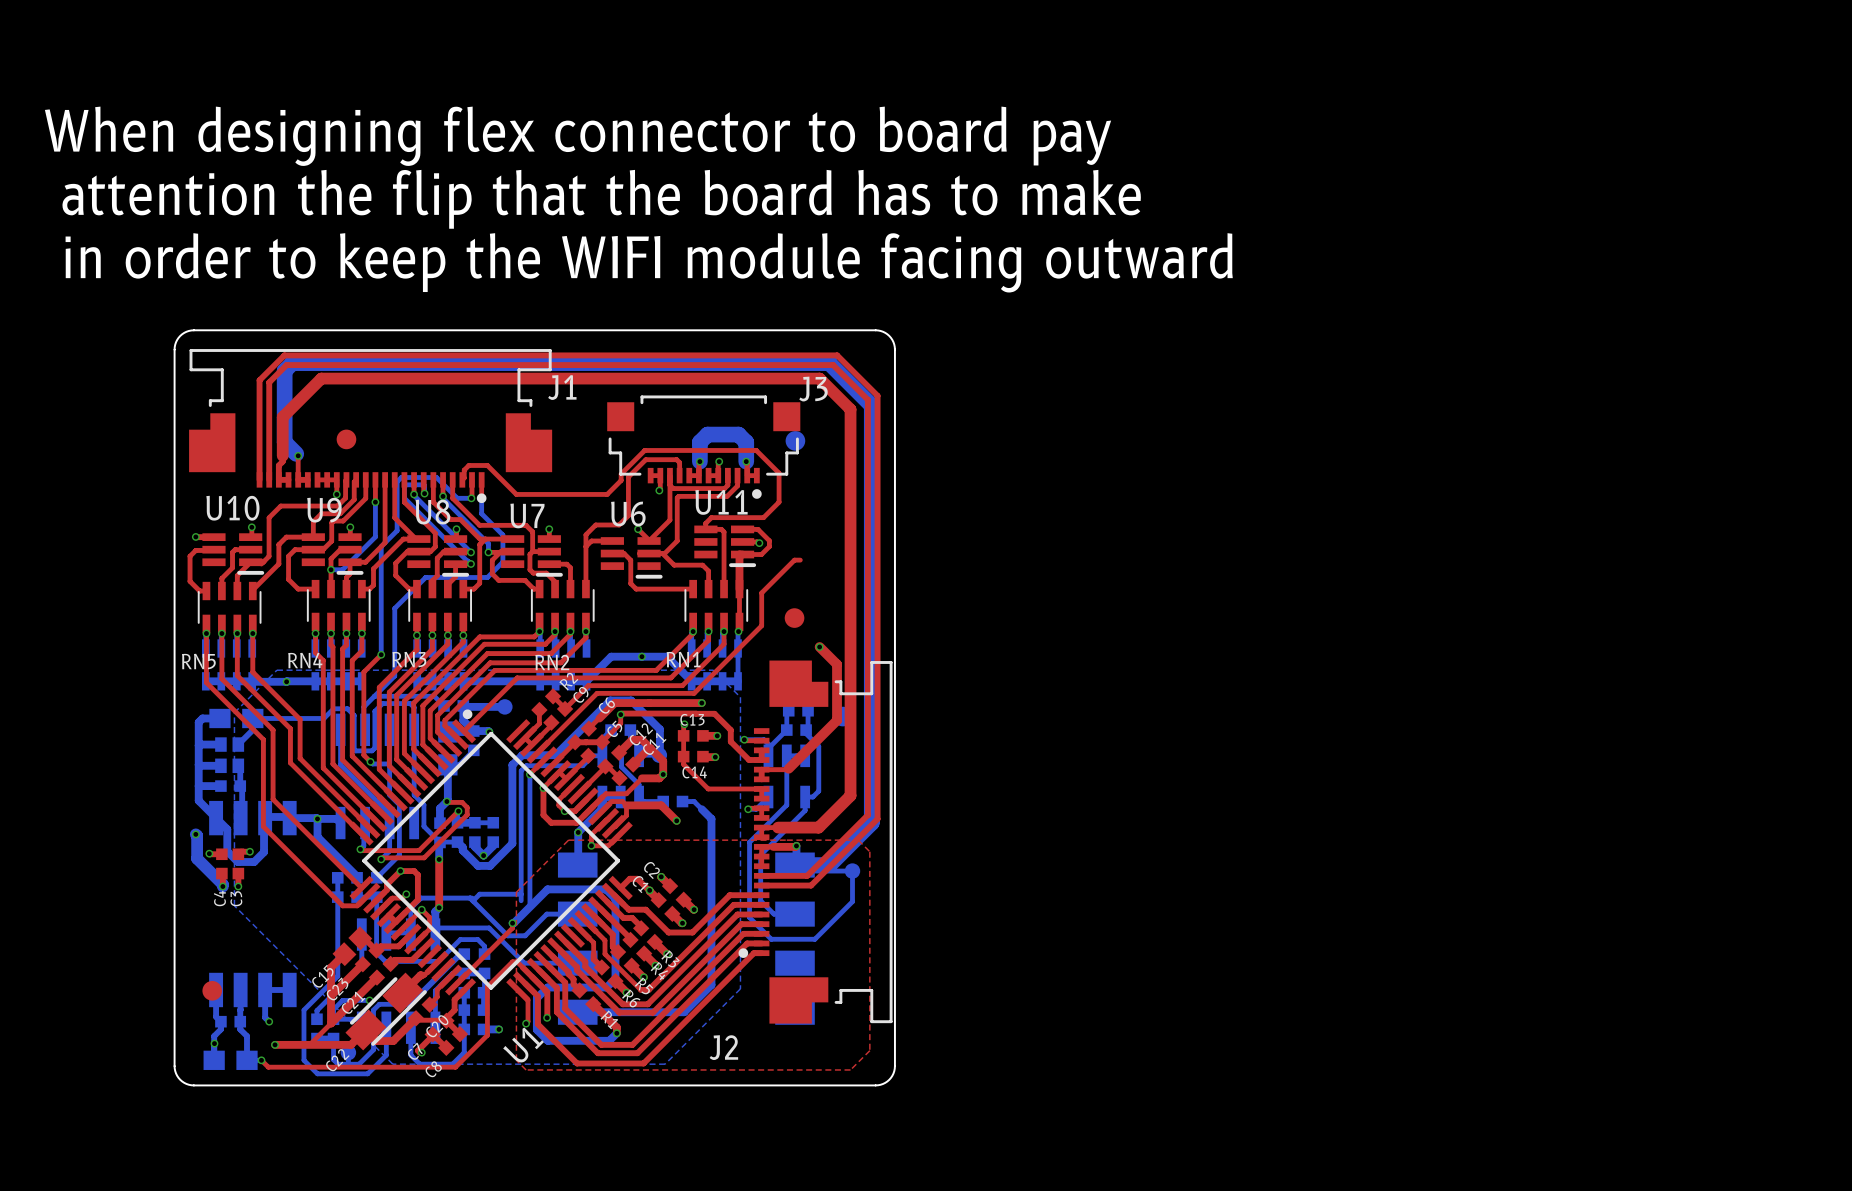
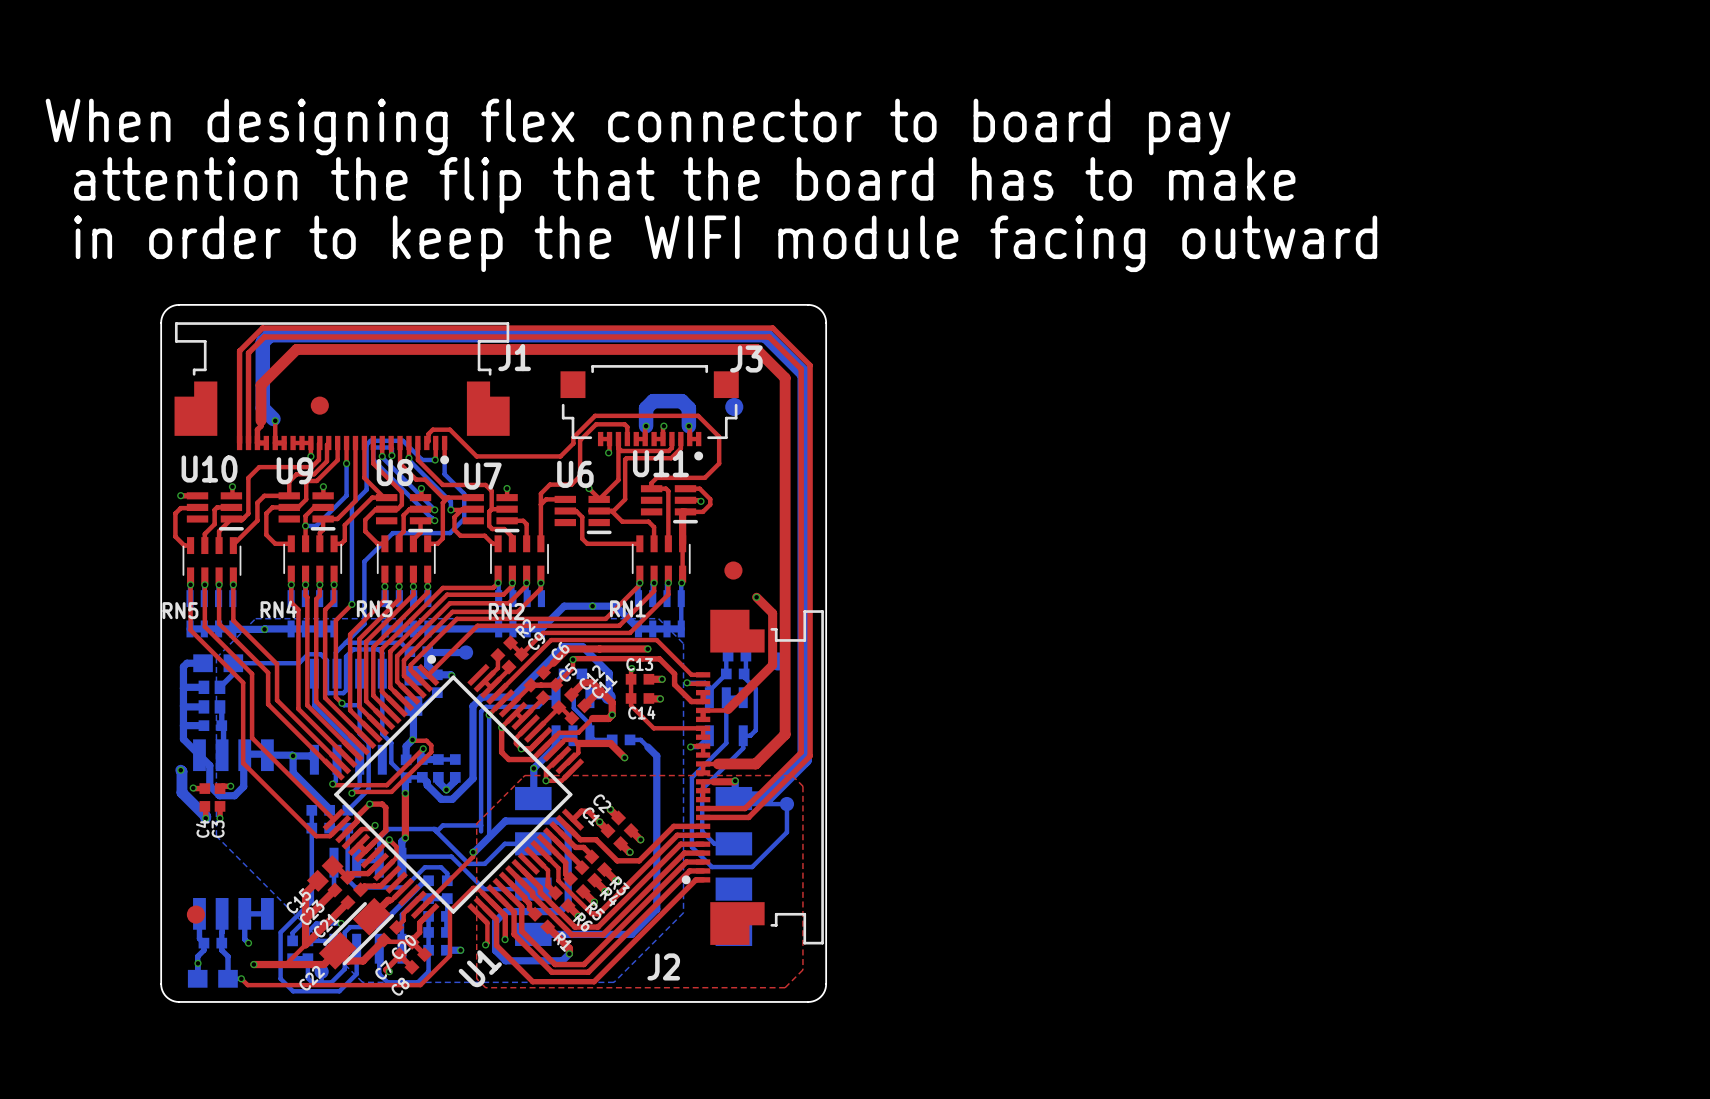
top track: (800, 560) (794, 560) (761, 592) (761, 625) (694, 693) -> (703, 674) (691, 674) (656, 640) (640, 640)

